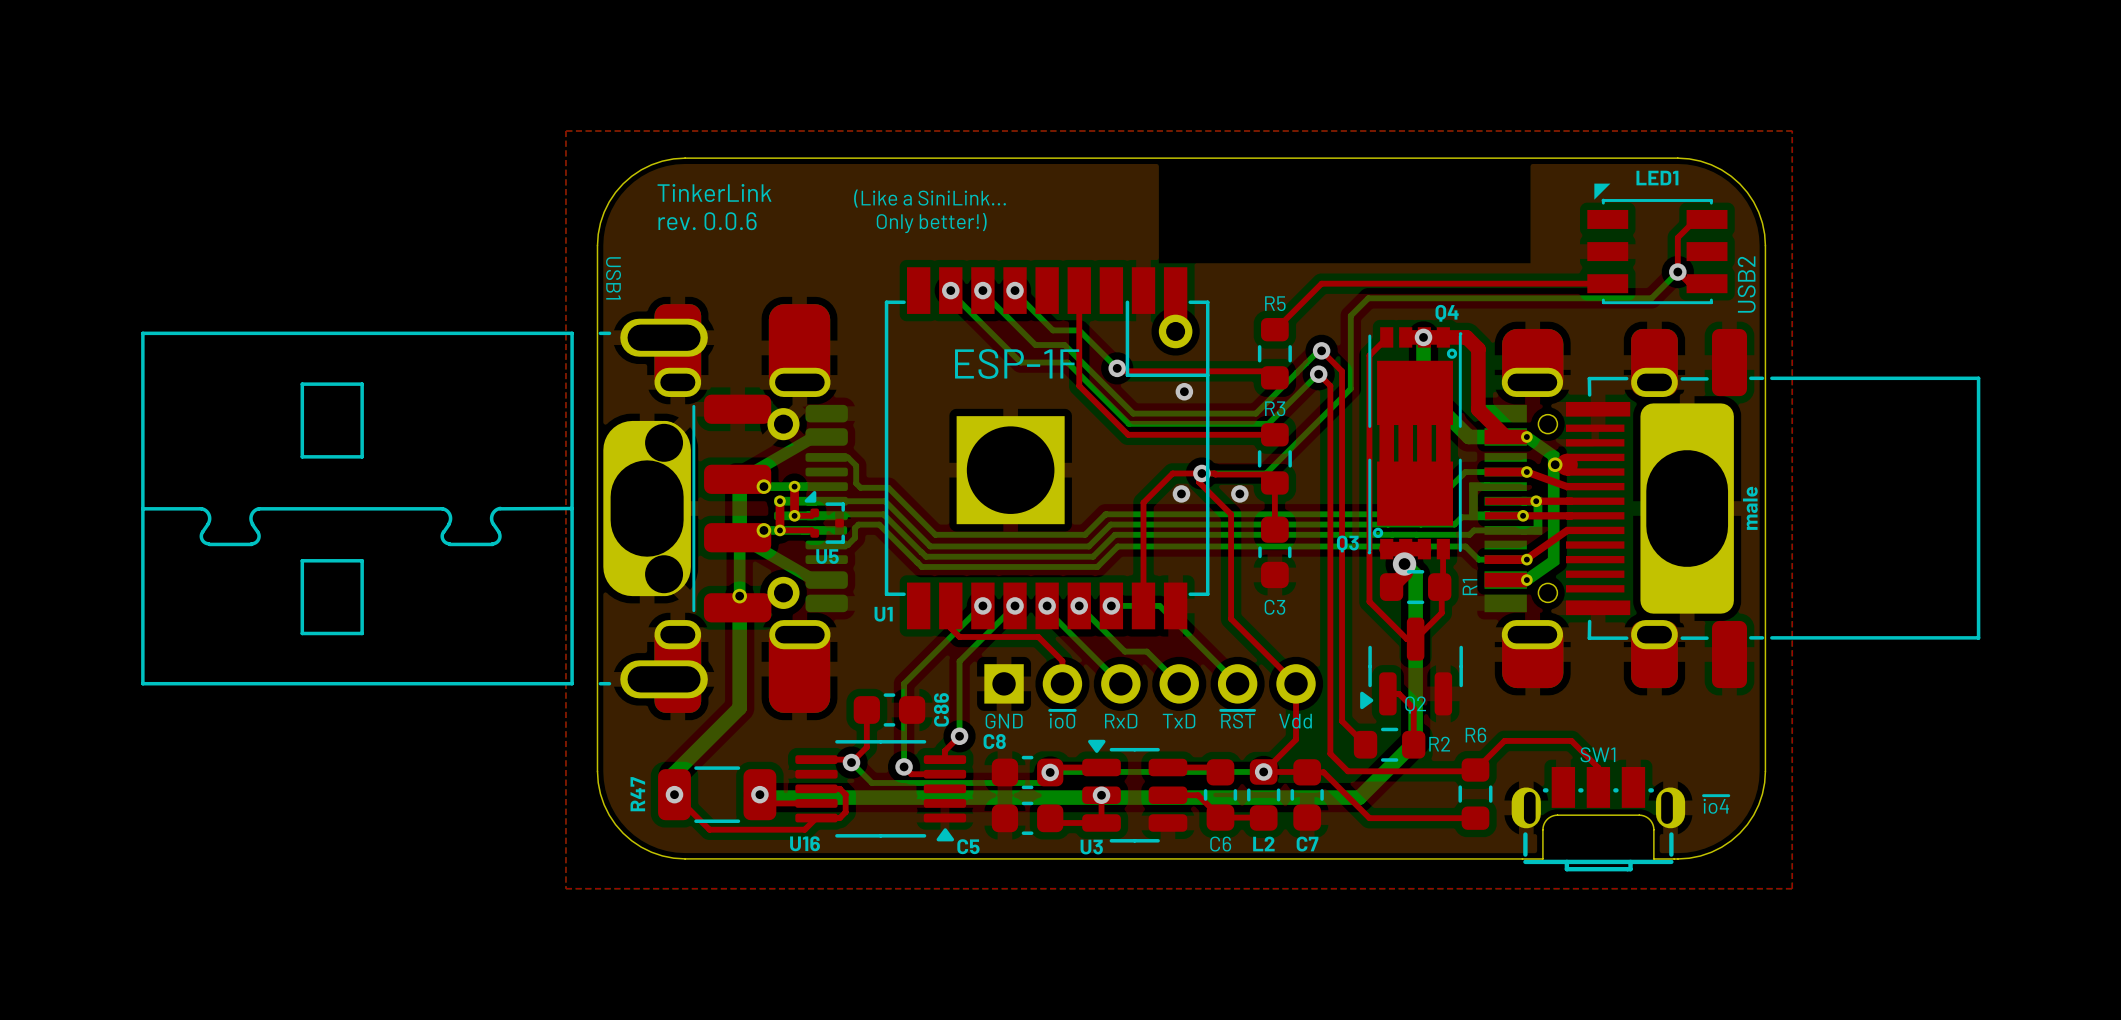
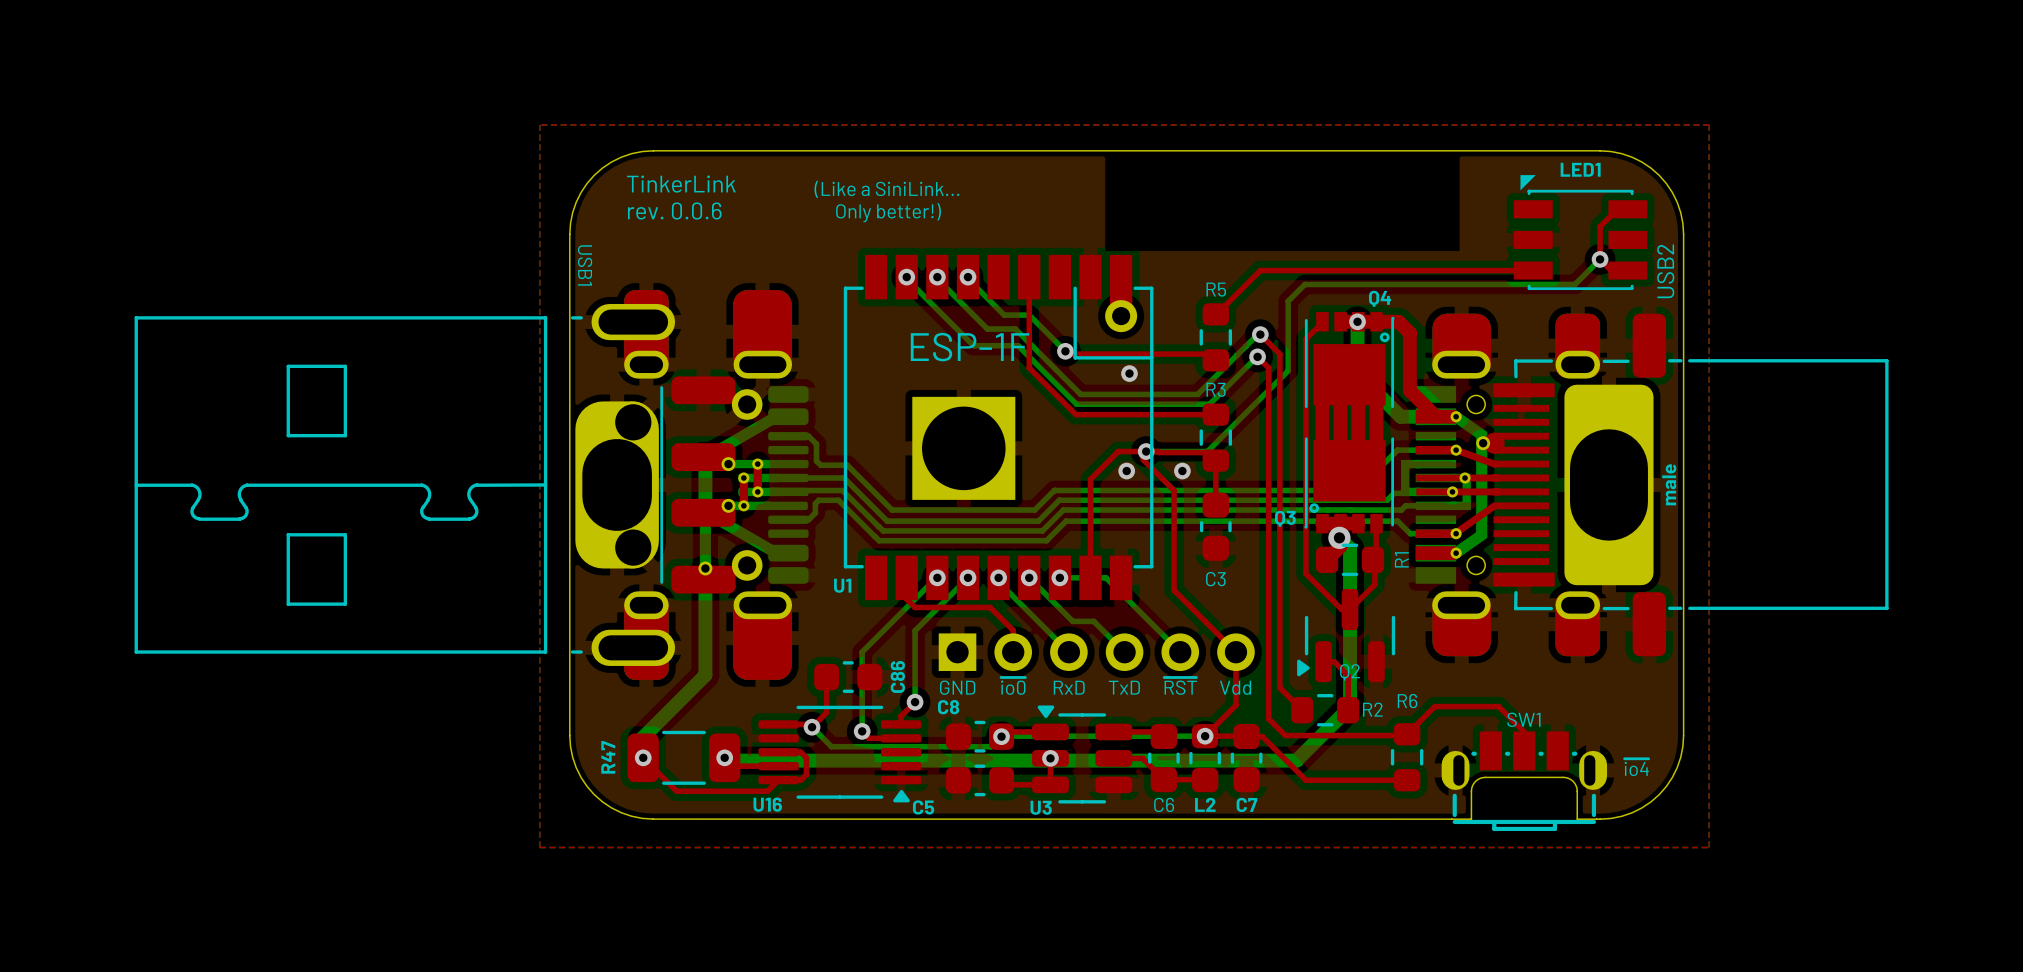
top track: (814, 512) (811, 515) (794, 515) -> none
U5: (824, 517) -> none
top track: (779, 530) (811, 530) (814, 533) -> none

